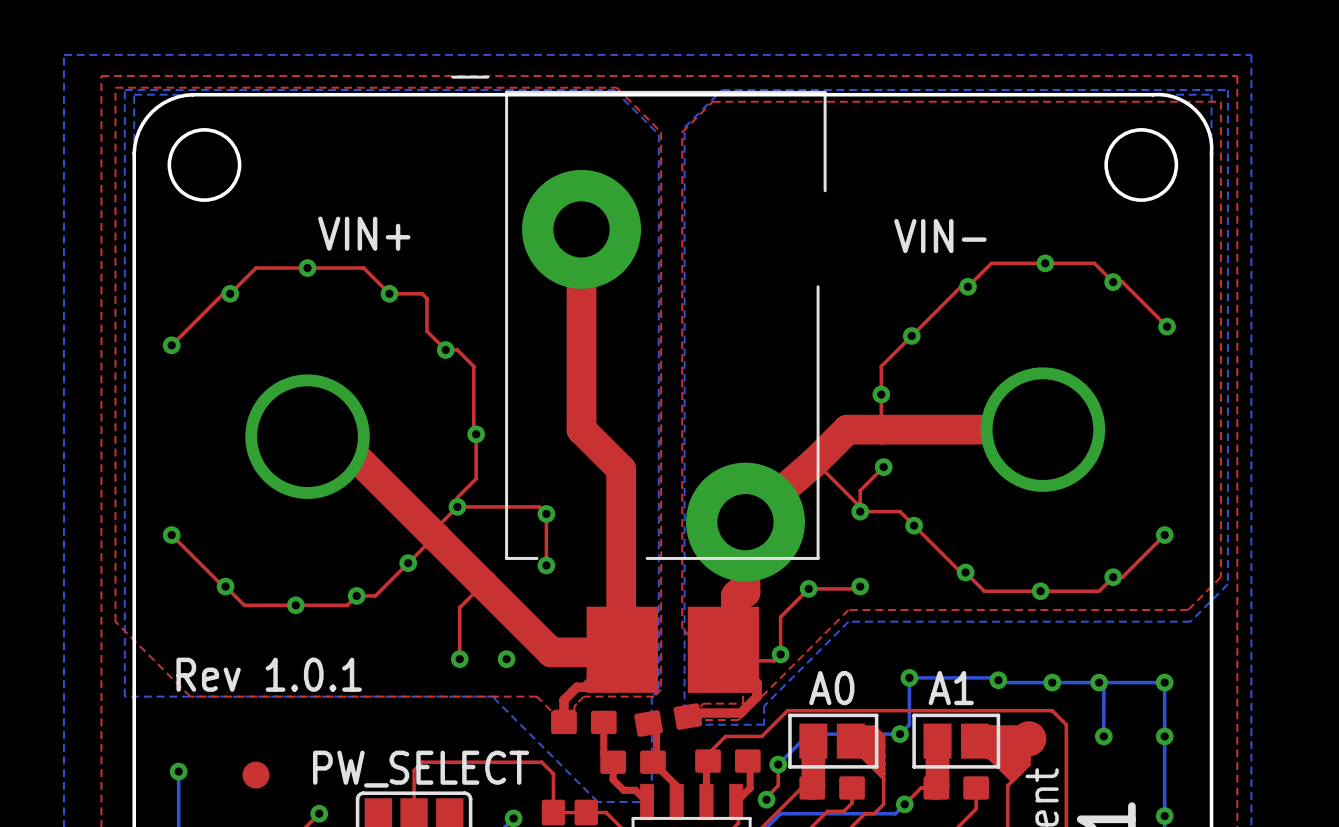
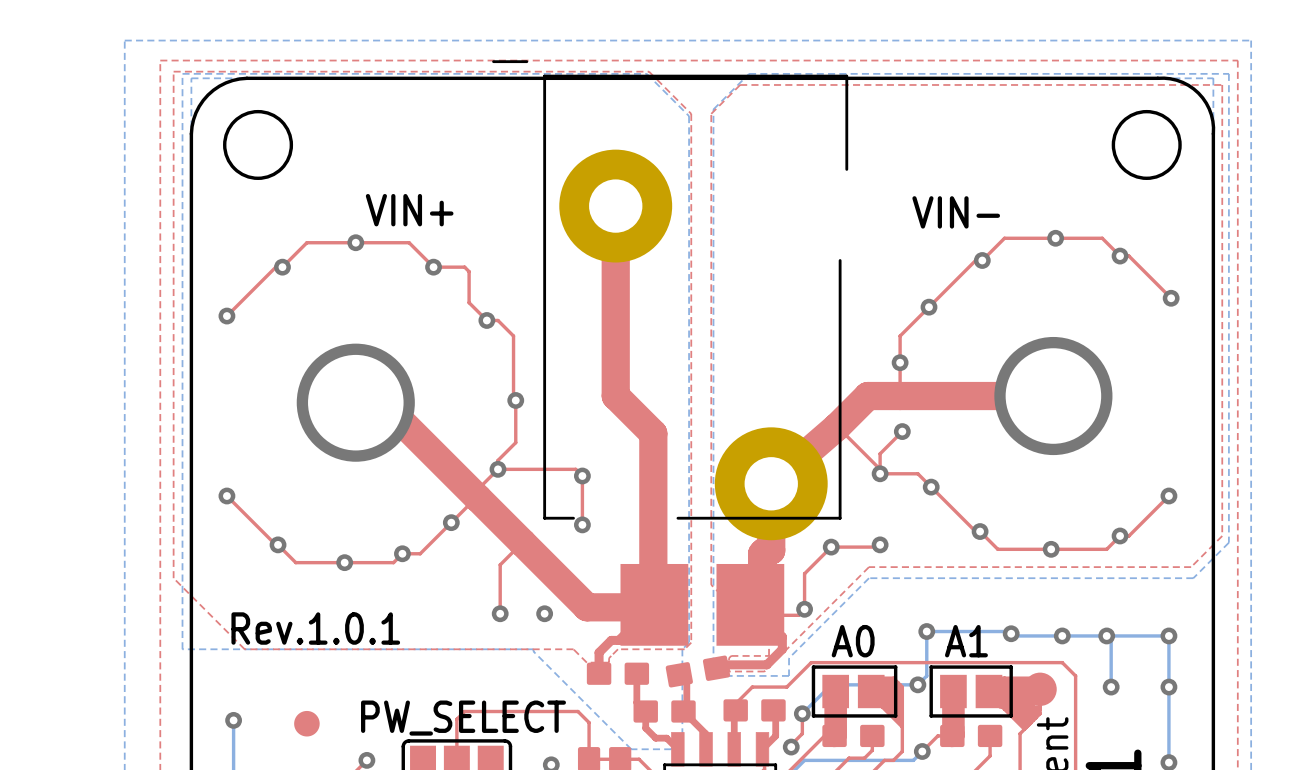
text: Rev 1.0.1 (269, 674) -> Rev.1.0.1 (315, 628)

